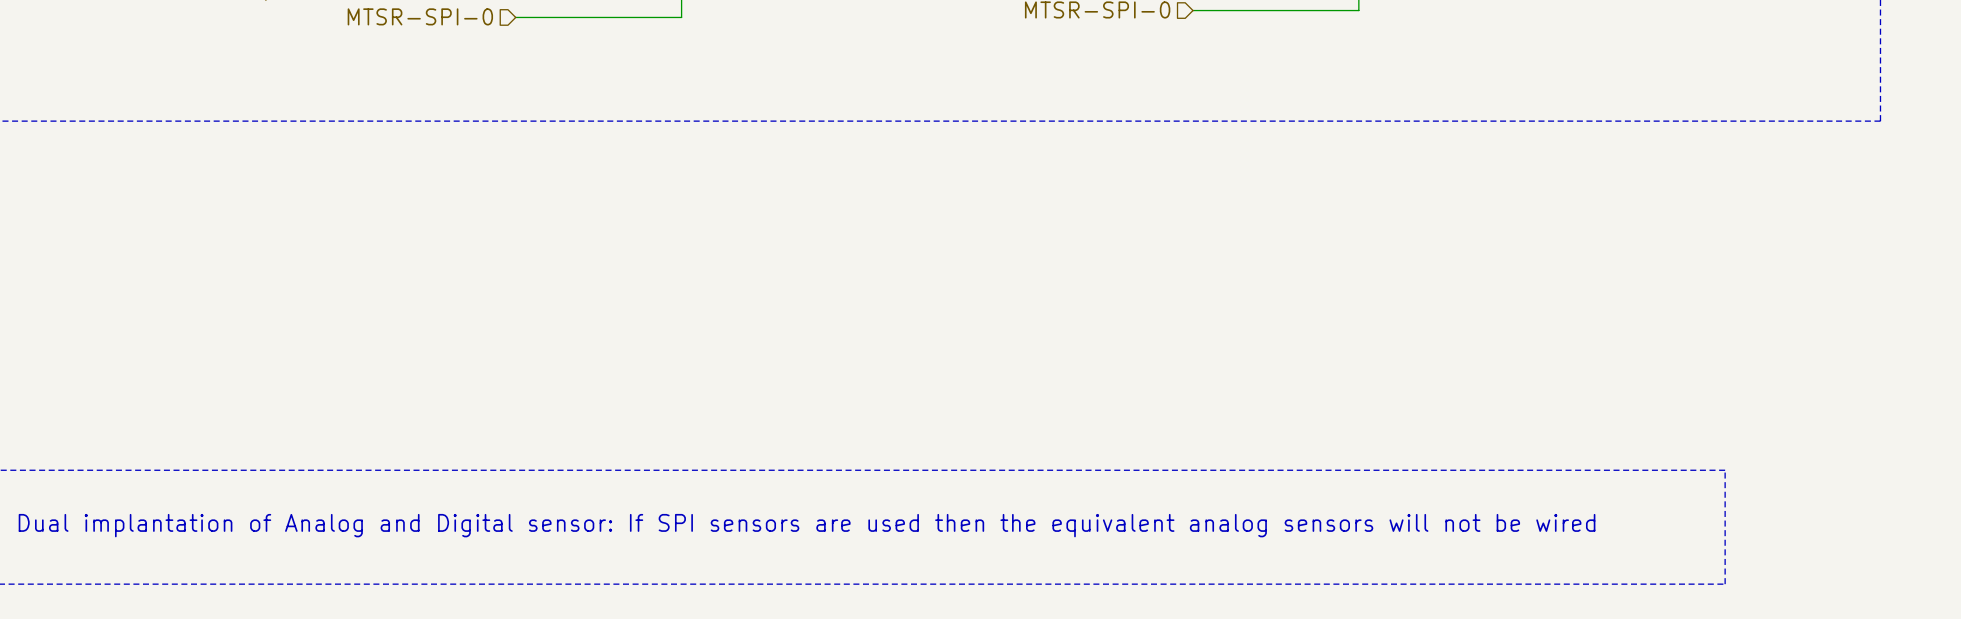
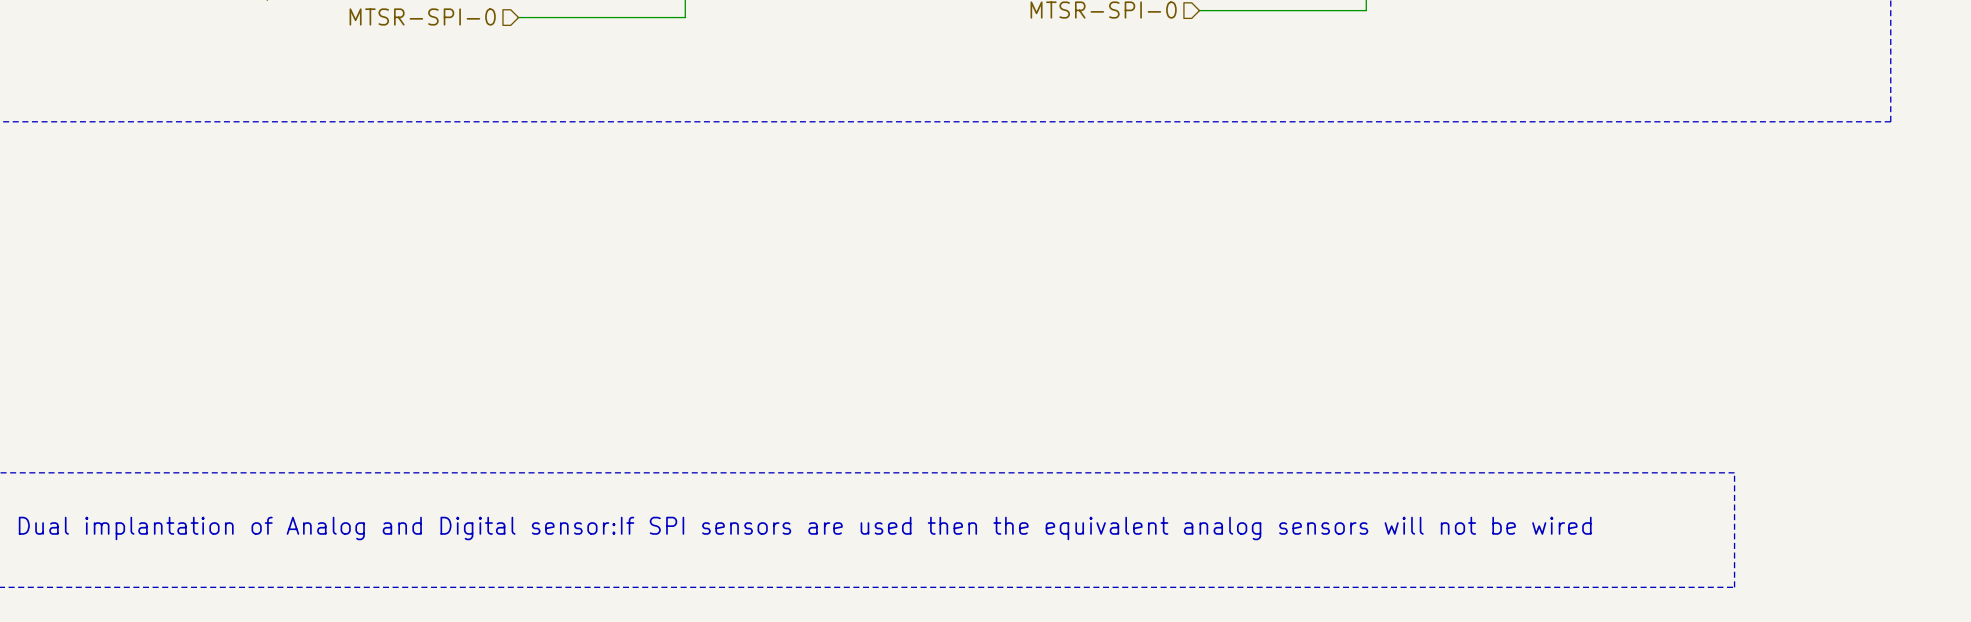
text: Dual implantation of Analog and Digital sensor: If SPI sensors are used then the equivalent analog sensors will not be wired (807, 525) -> Dual implantation of Analog and Digital sensor:If SPI sensors are used then the equivalent analog sensors will not be wired (805, 528)

